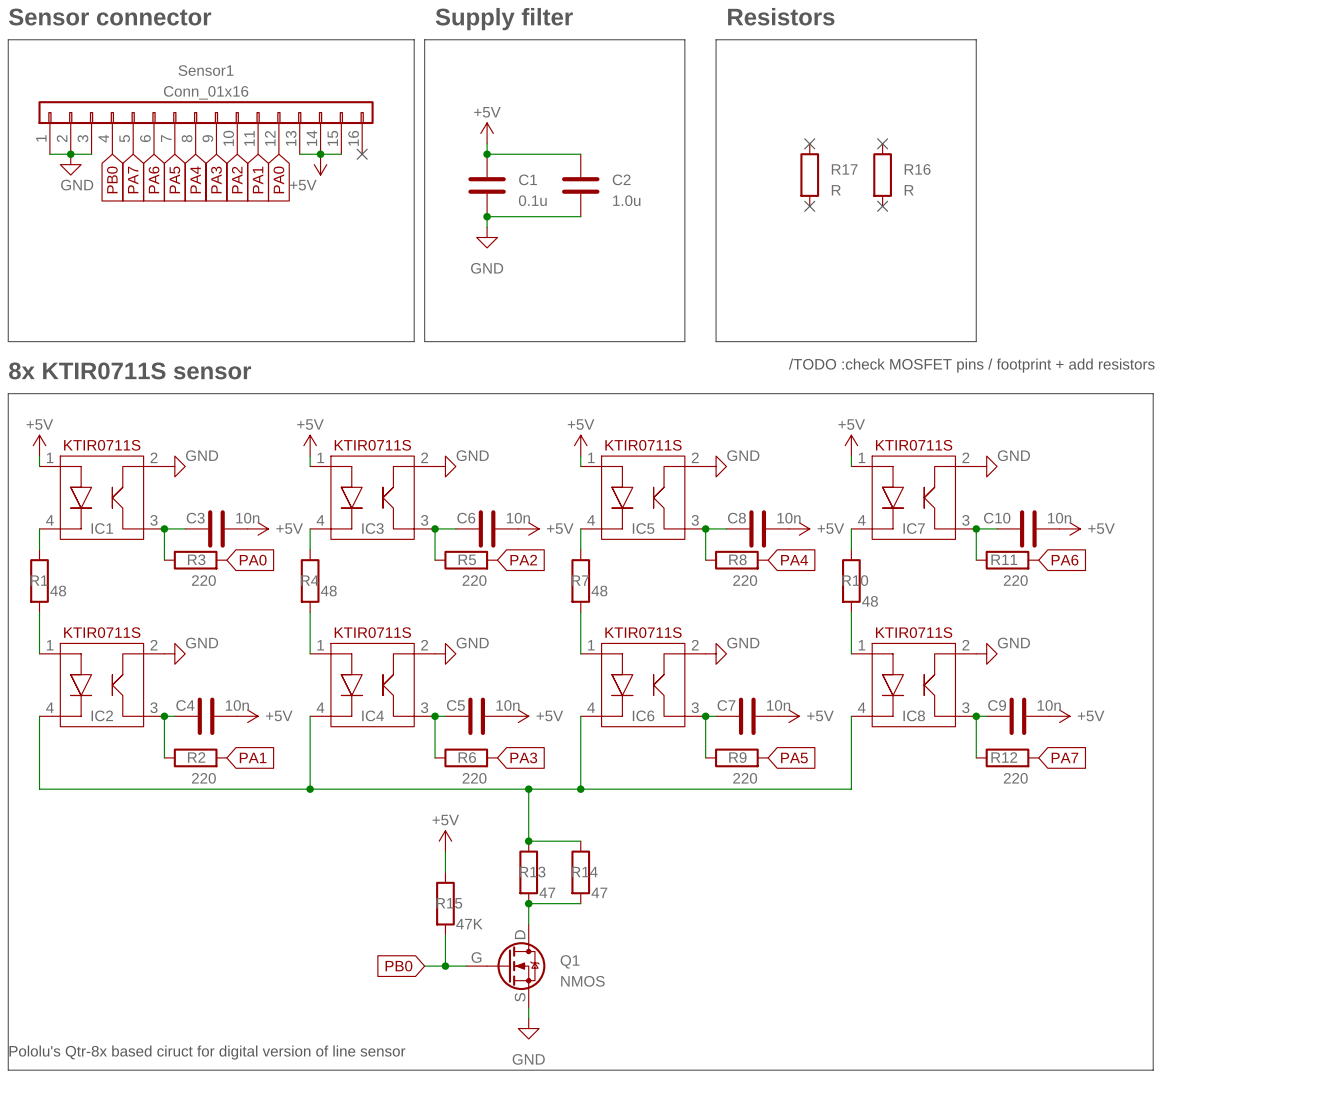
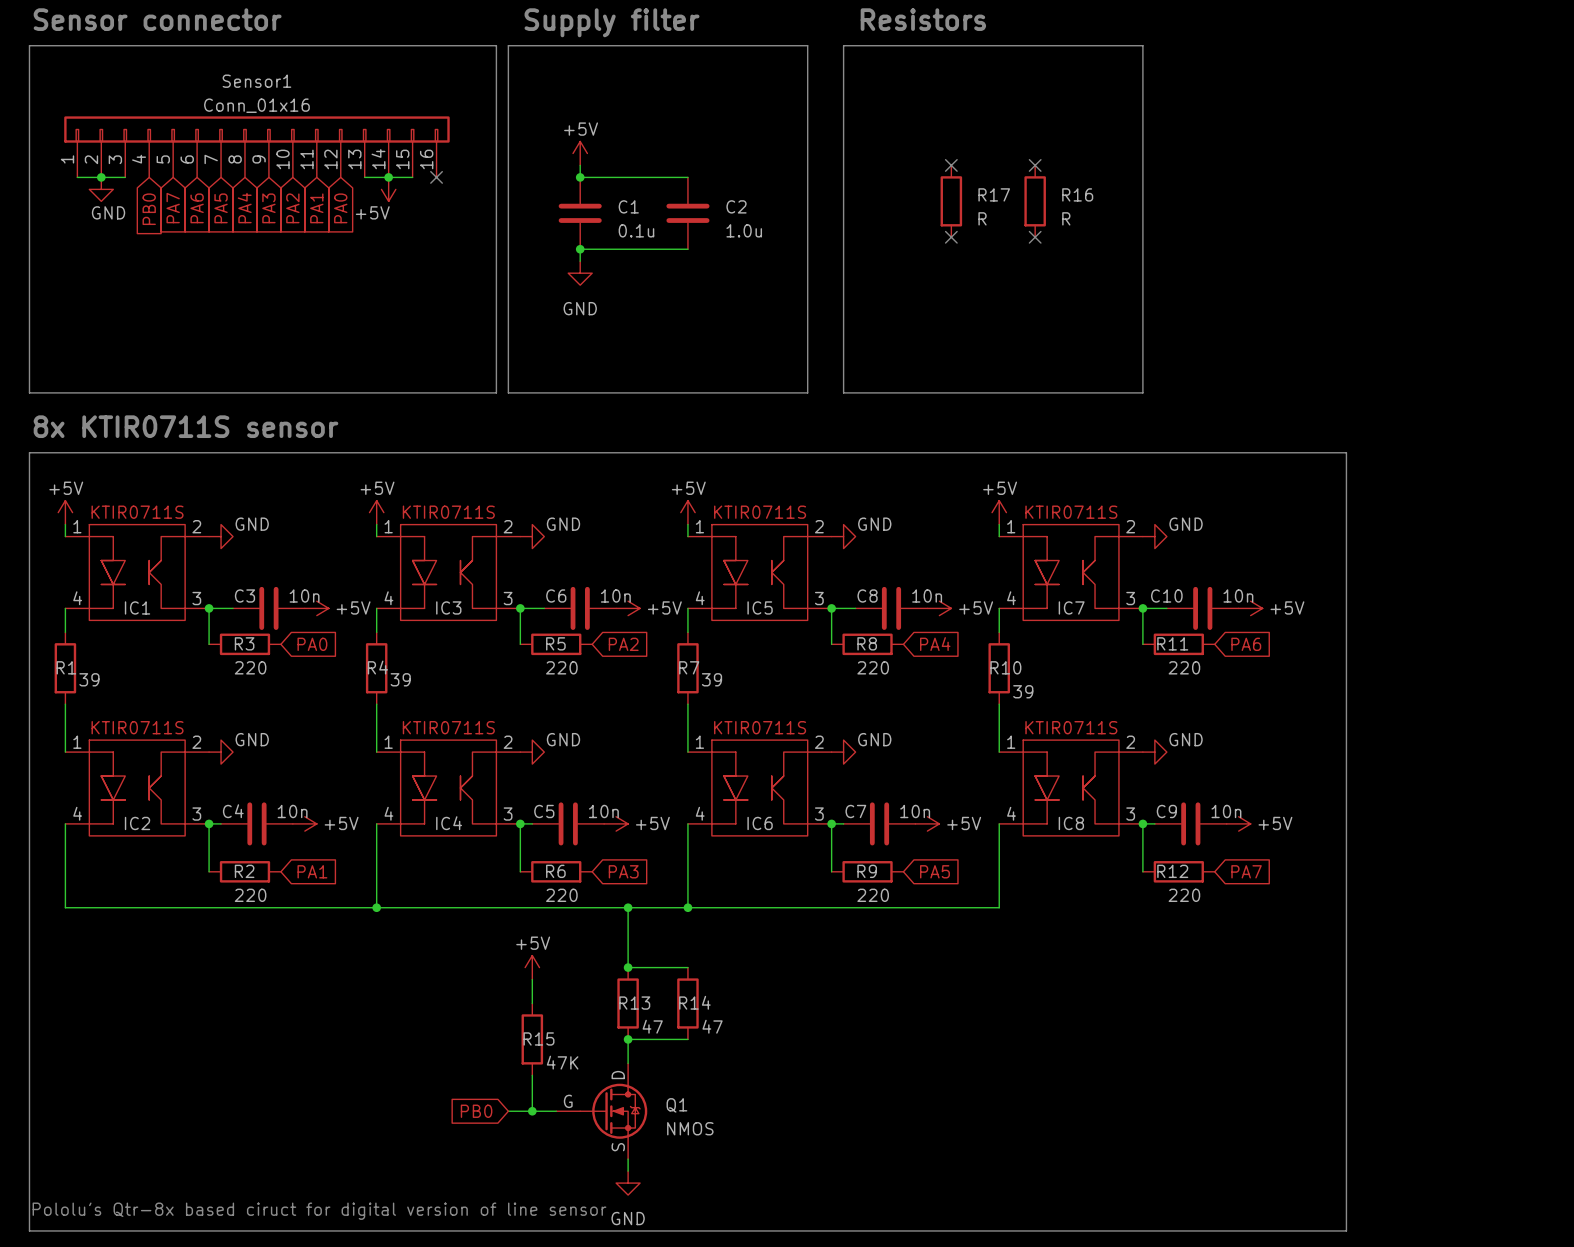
text: /TODO :check MOSFET pins / footprint + add resistors (971, 365) -> none
R1 value: 48 (58, 591) -> 39 (89, 679)
R4 value: 48 (328, 591) -> 39 (400, 679)
R7 value: 48 (599, 591) -> 39 (711, 679)
R10 value: 48 (870, 601) -> 39 (1023, 691)

